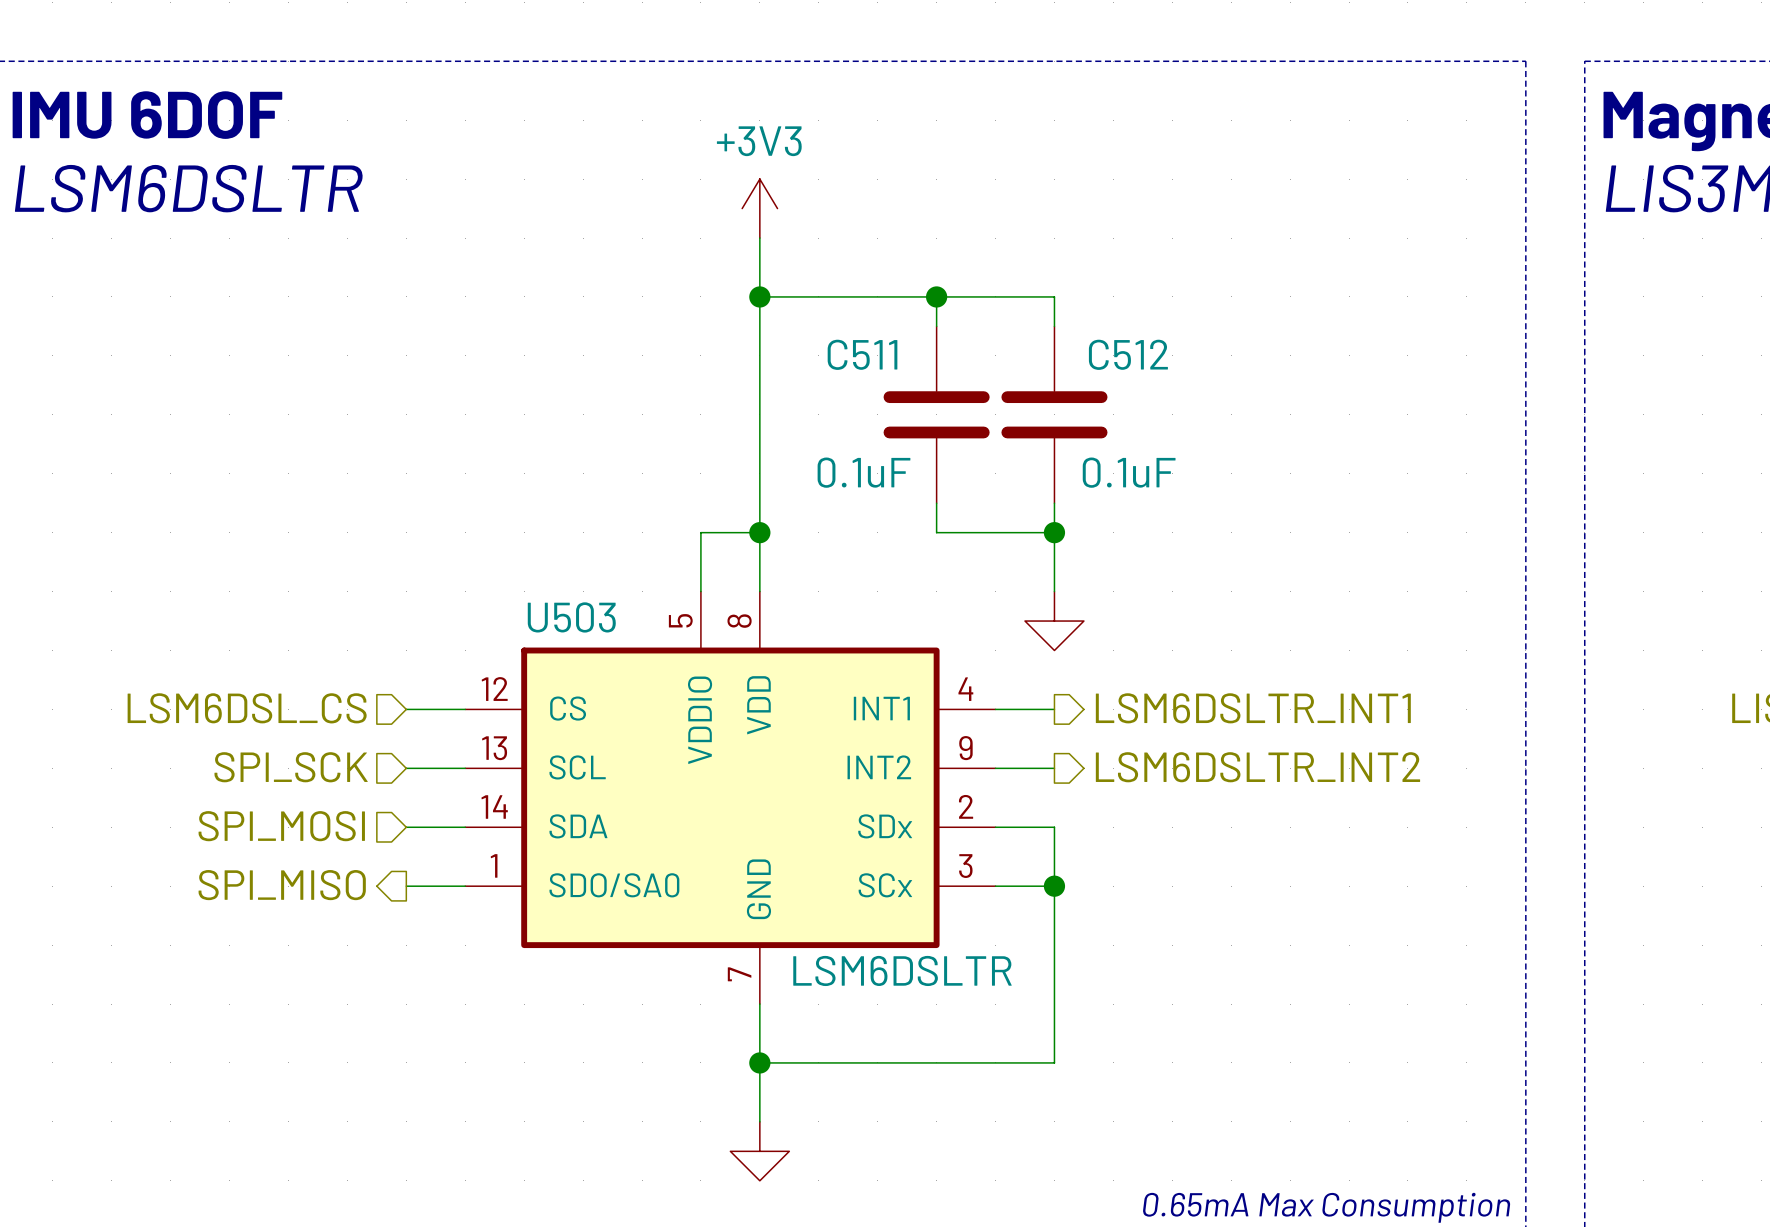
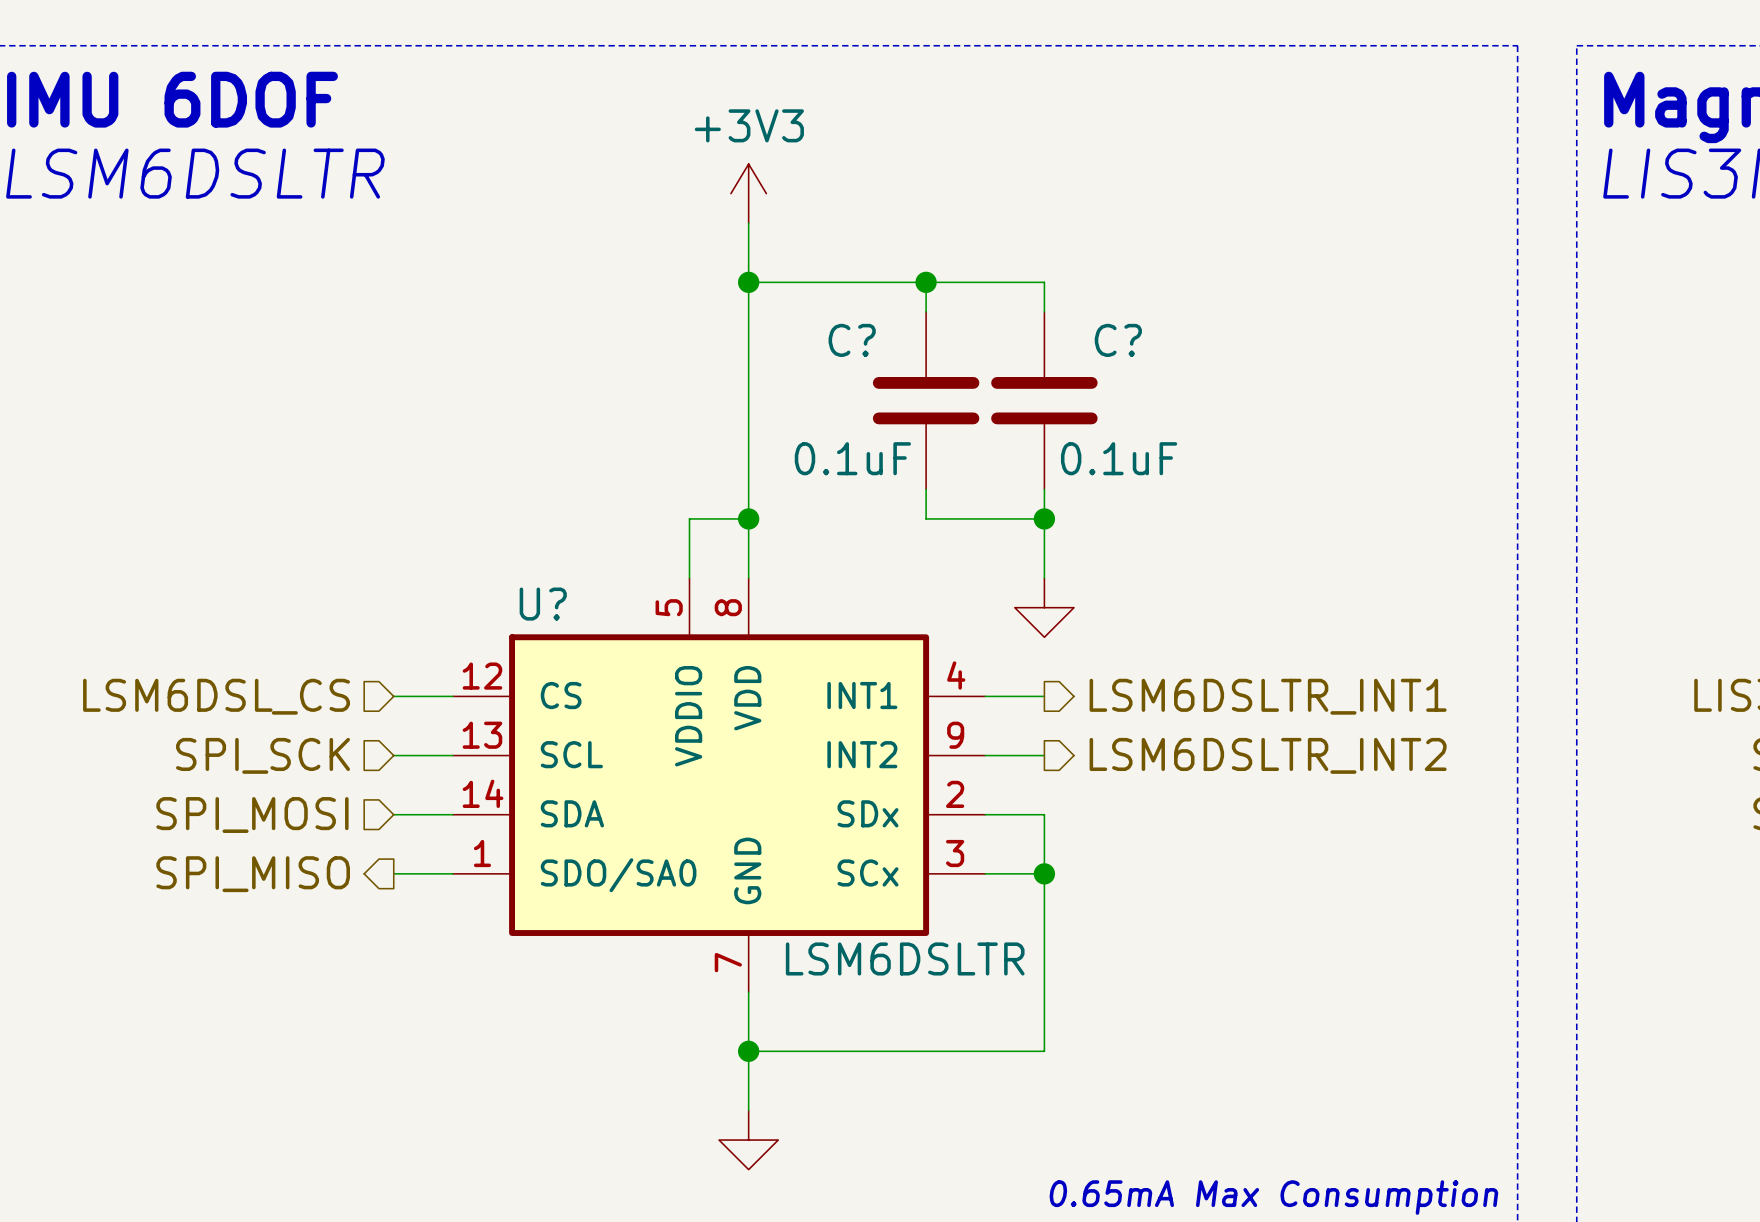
C511 name: C511 (862, 354) -> C? (852, 340)
C512 name: C512 (1128, 354) -> C? (1118, 340)
U503 name: U503 (571, 617) -> U? (543, 604)

